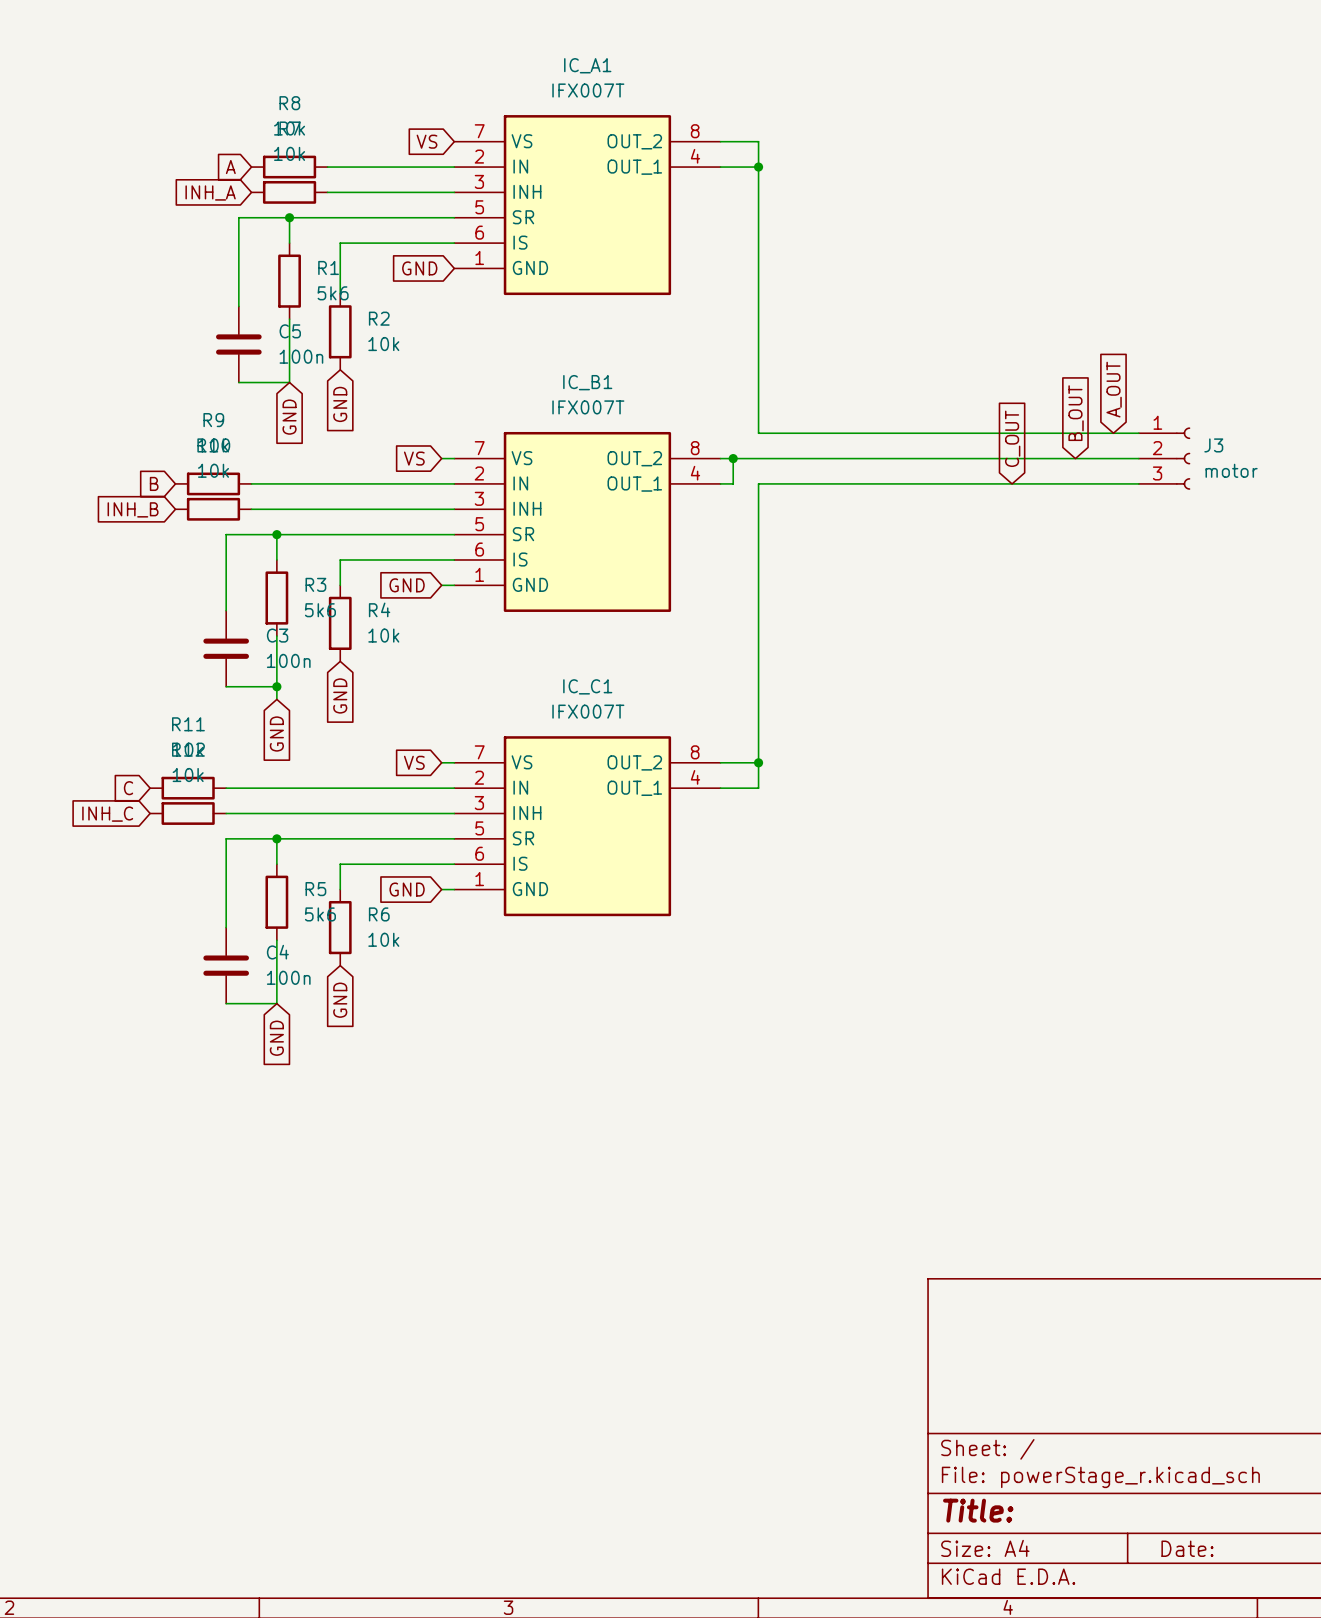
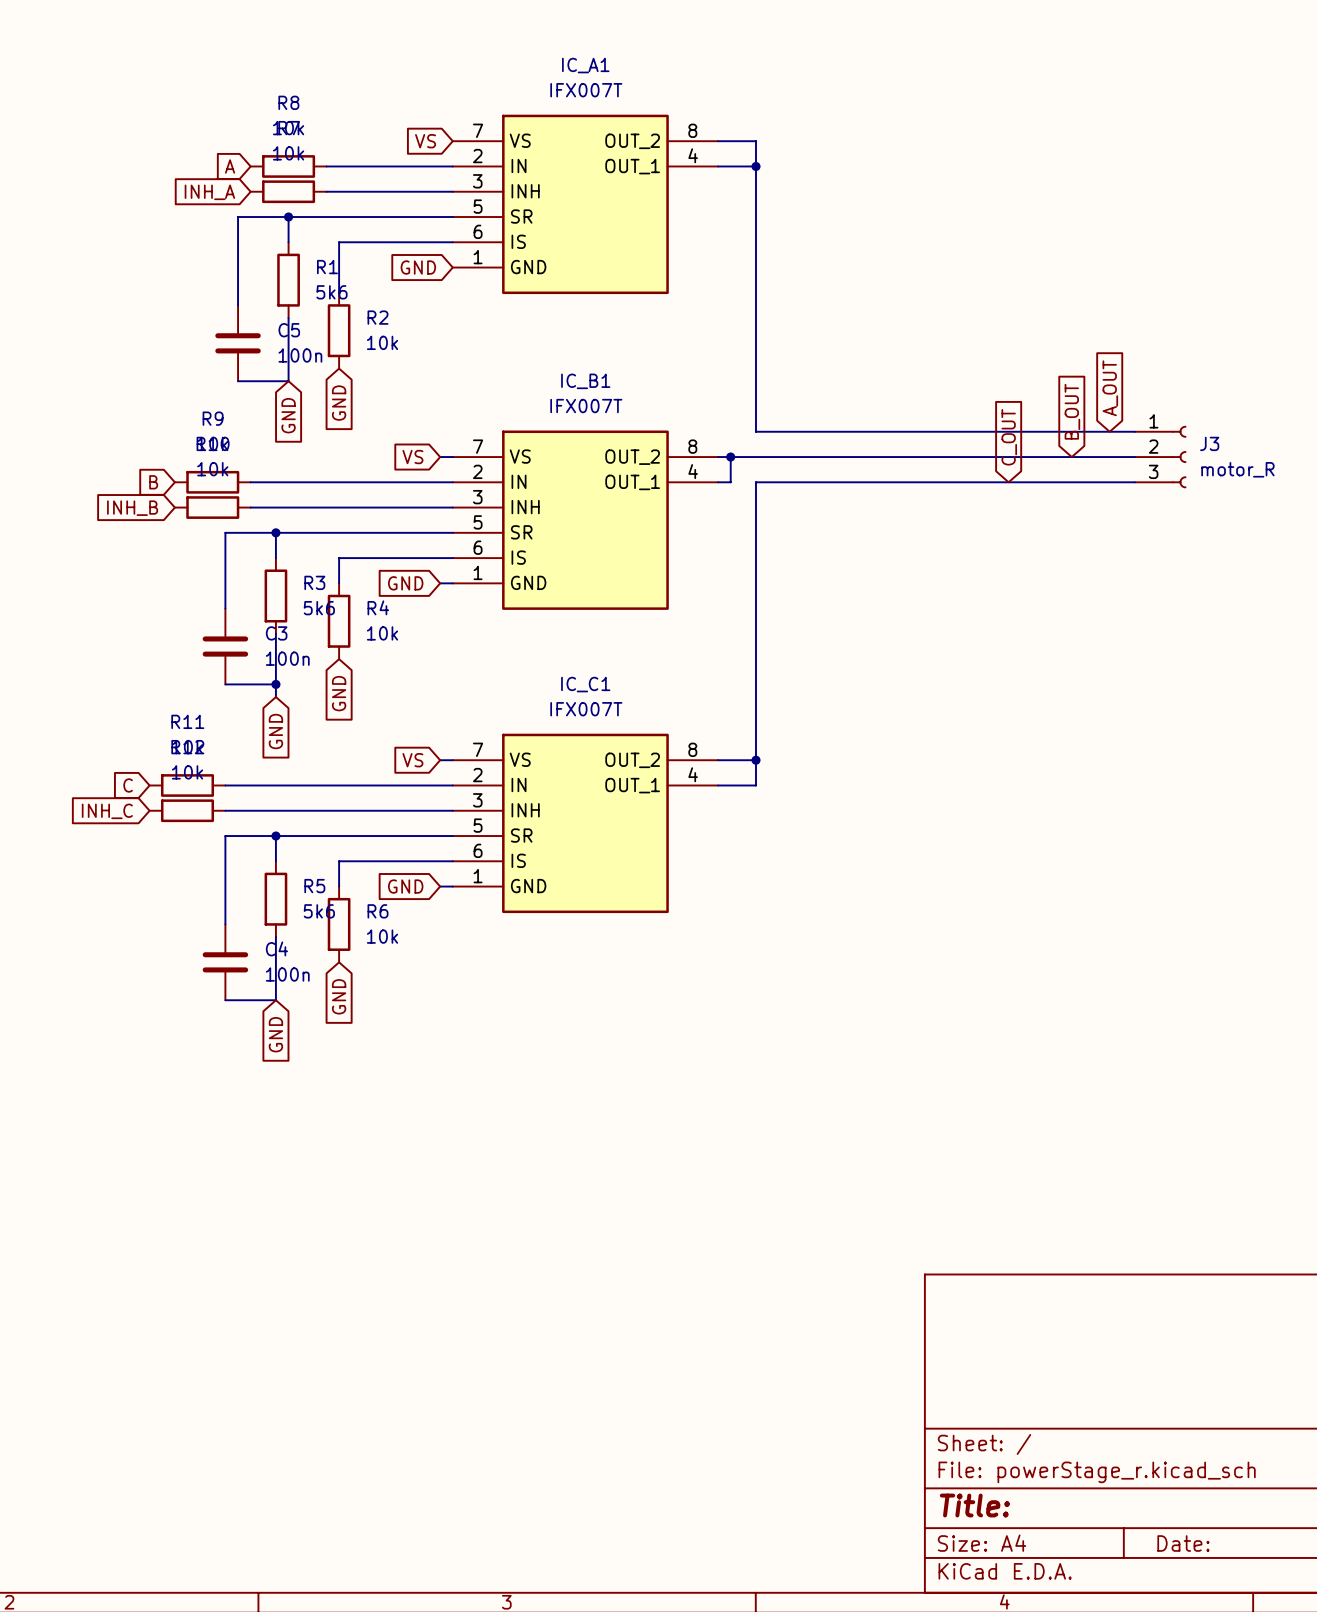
J3 value: motor (1231, 470) -> motor_R (1237, 469)

